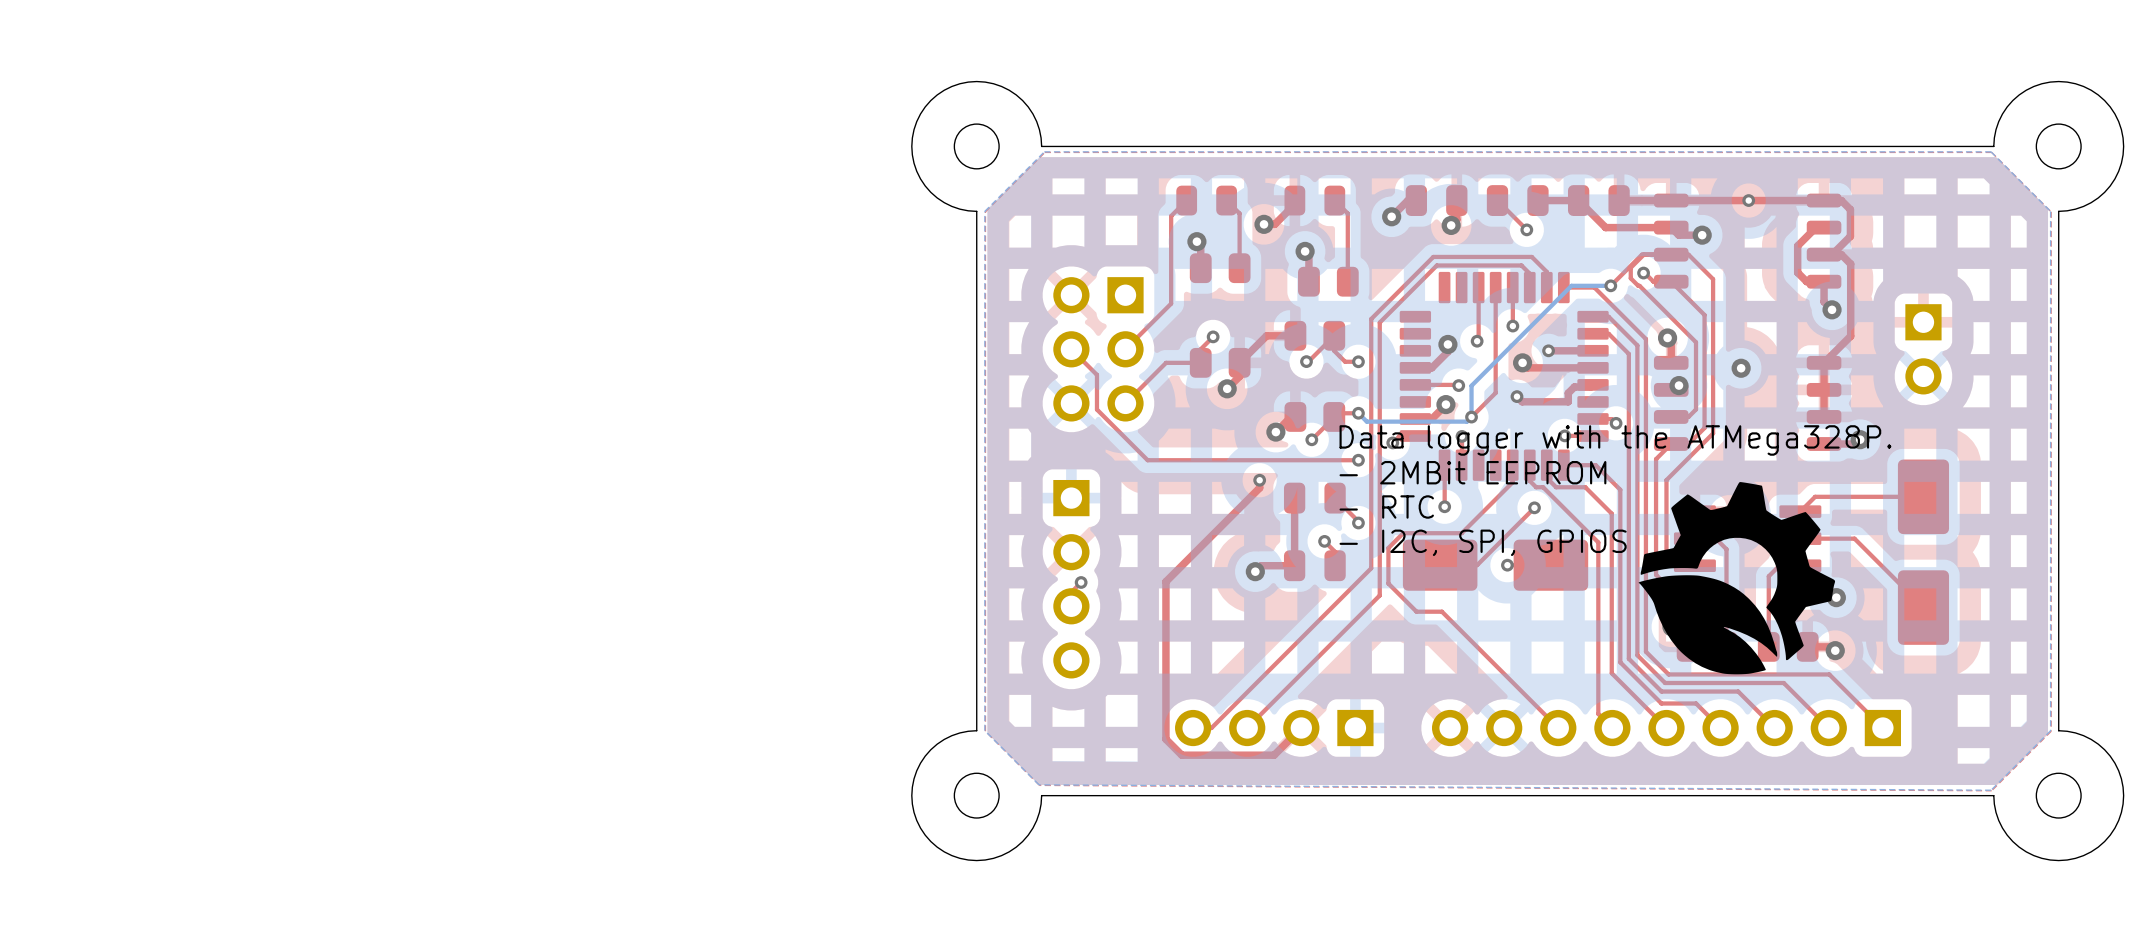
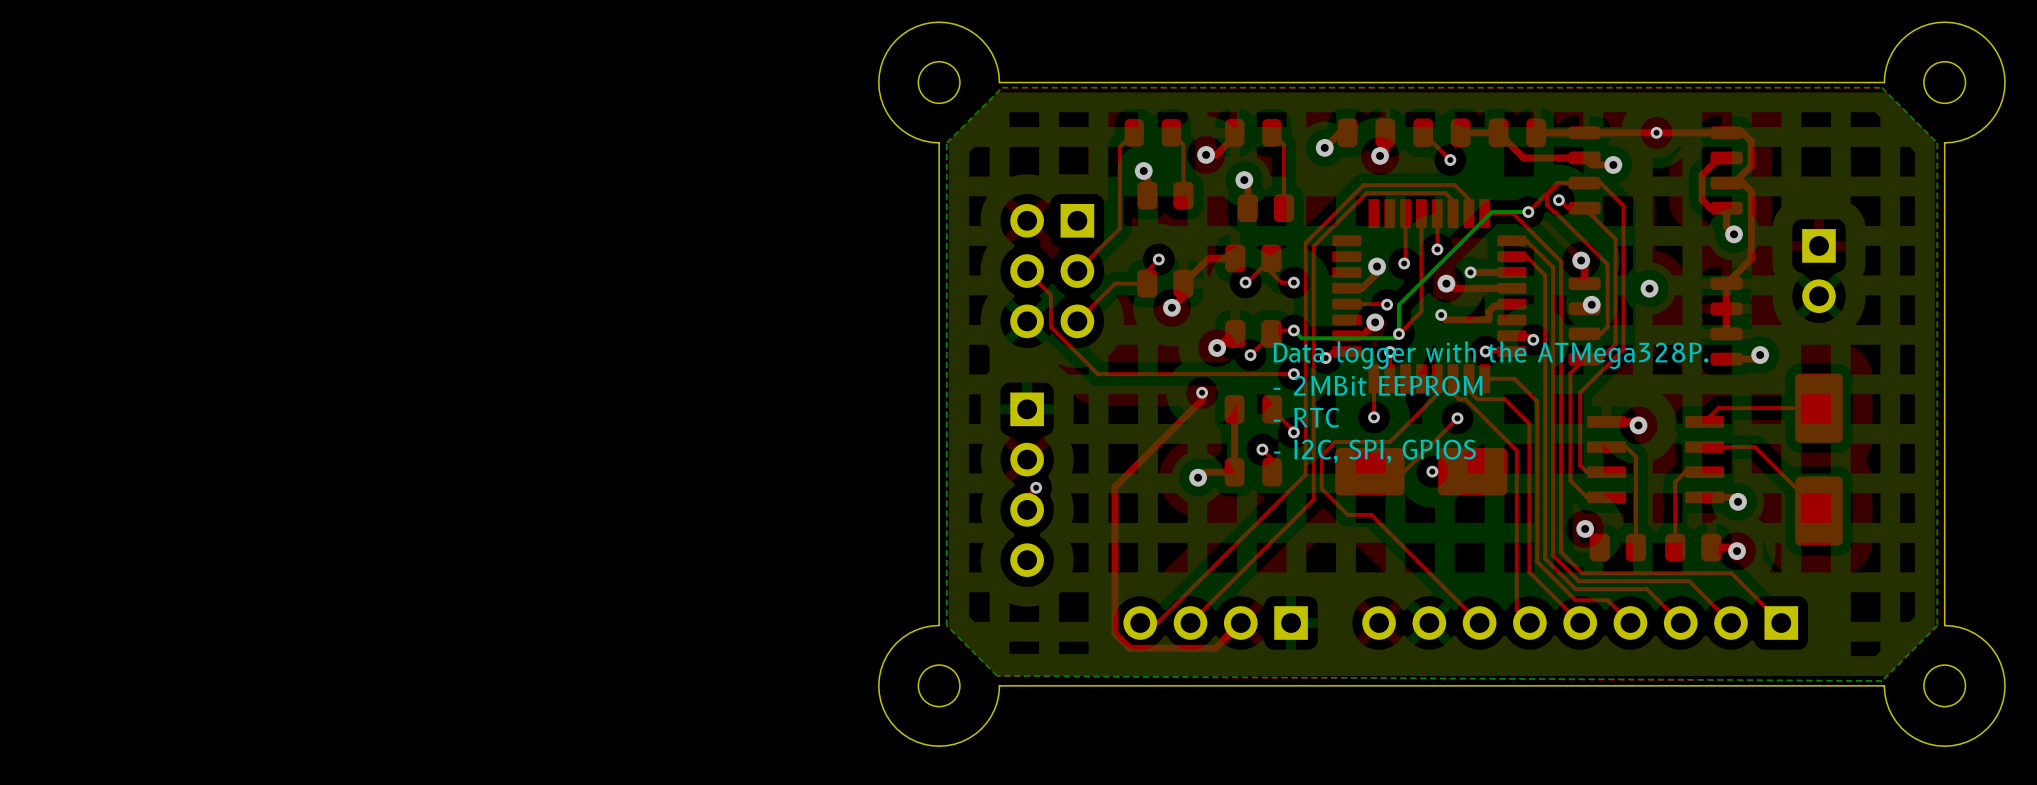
drawing: [1638, 482, 1836, 675] -> none

